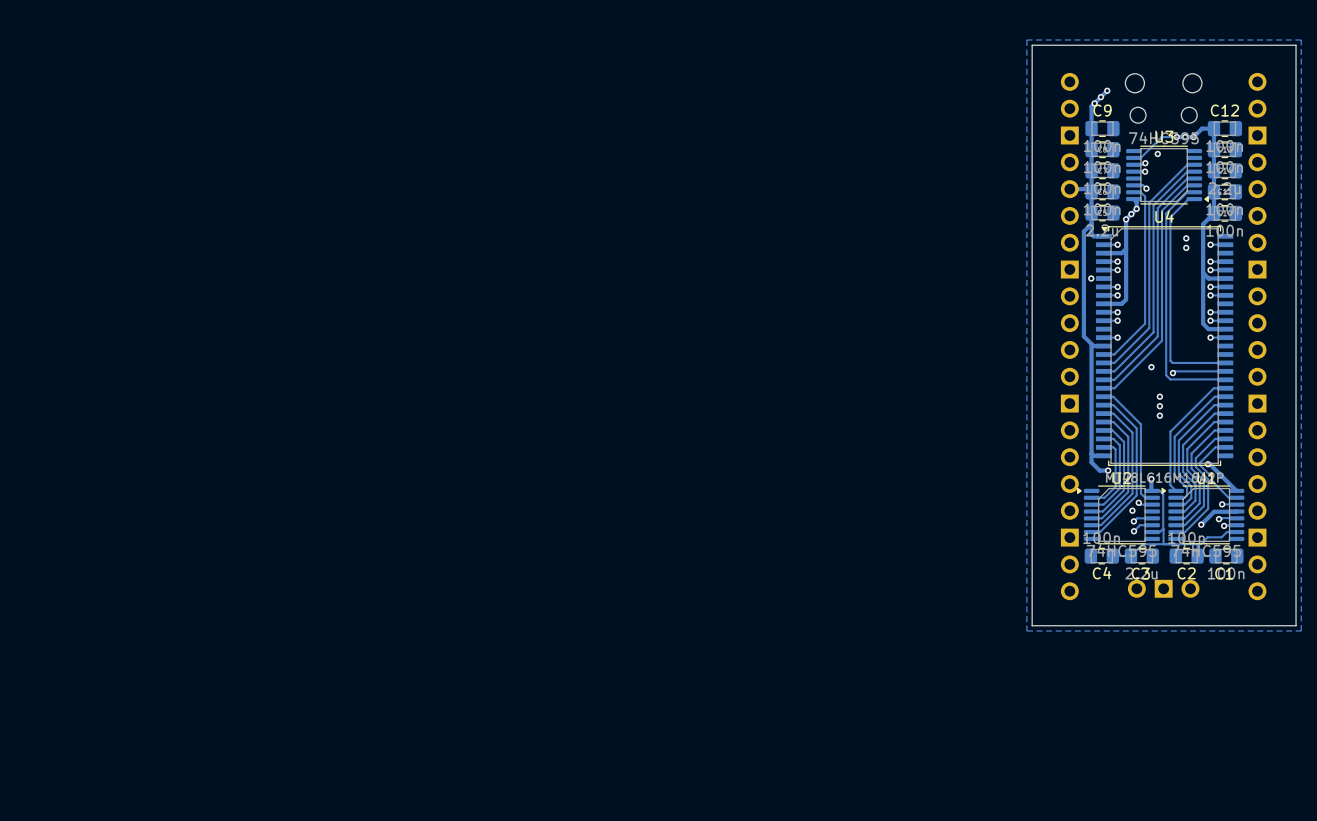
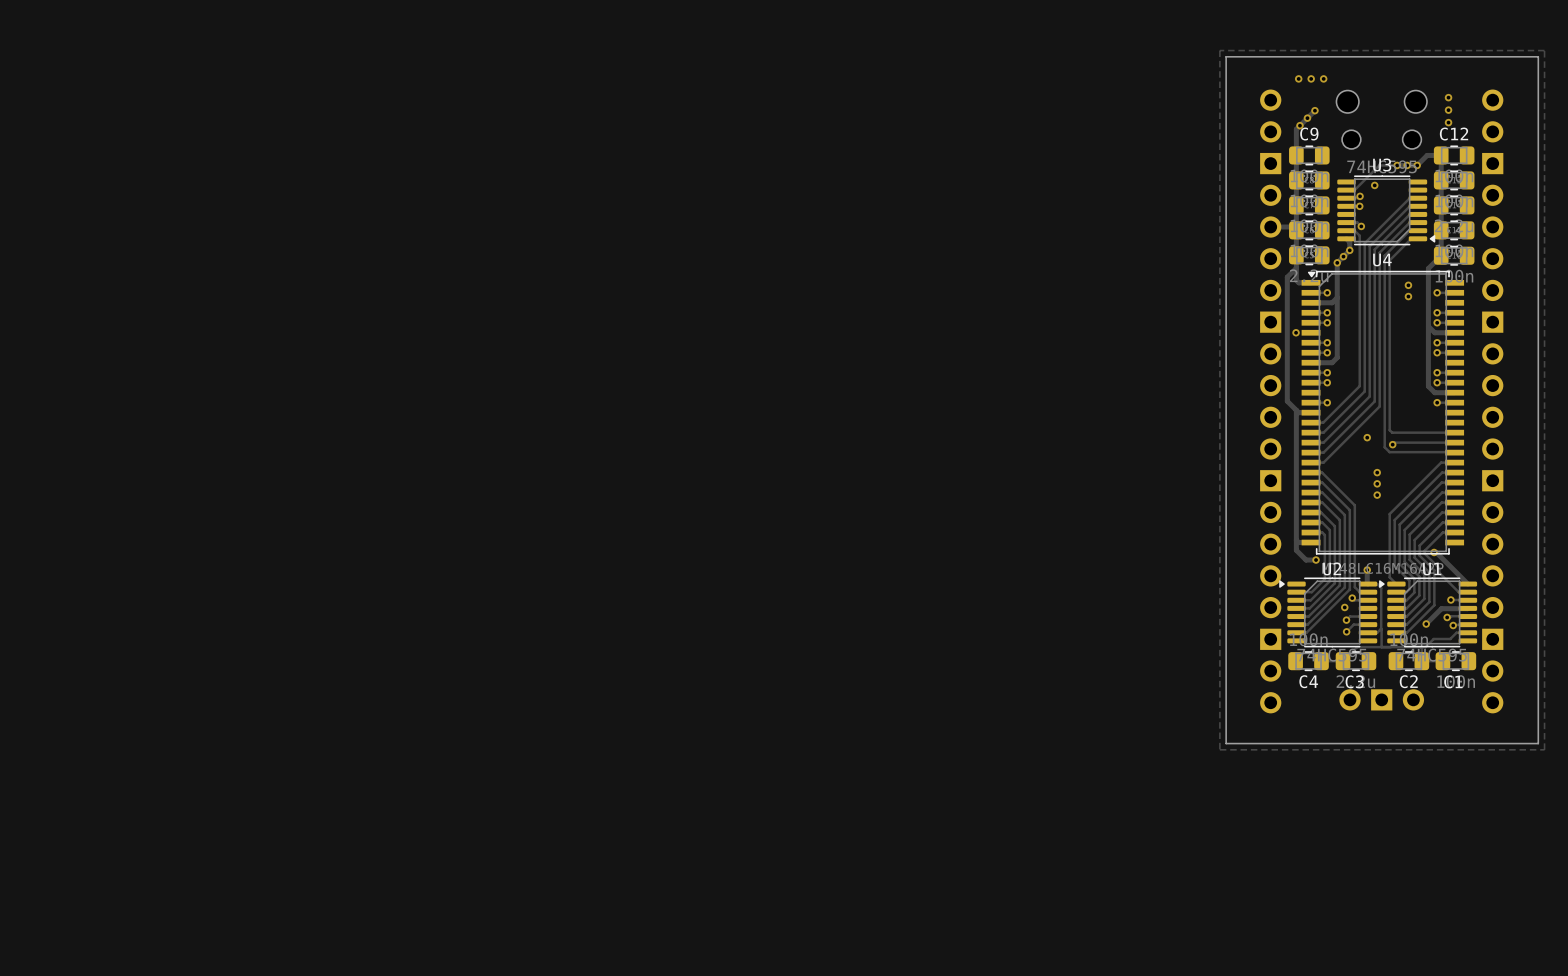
via: none -> (1298, 78)
via: none -> (1311, 78)
via: none -> (1323, 78)
via: none -> (1448, 97)
via: none -> (1448, 110)
via: none -> (1448, 122)

